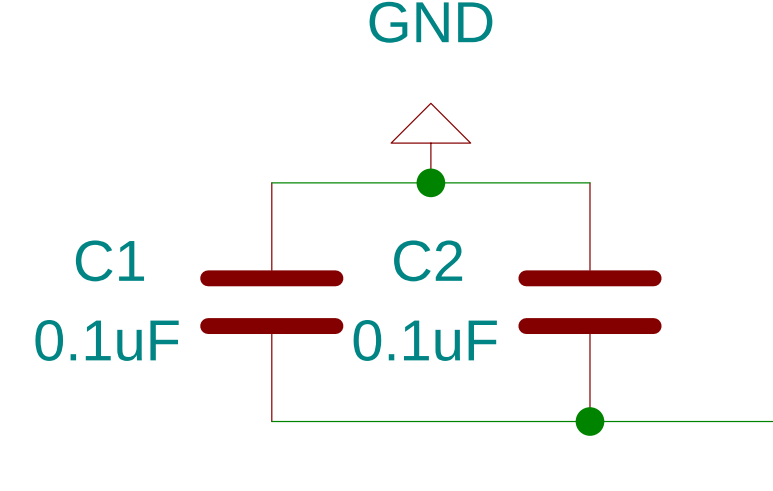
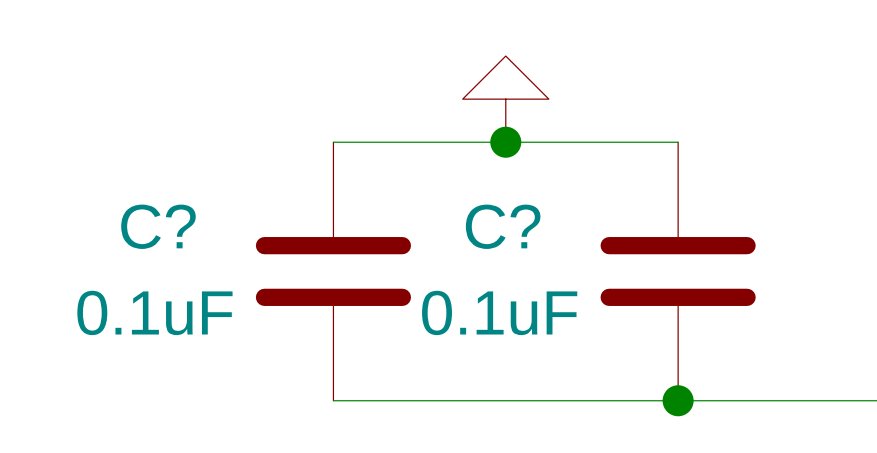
C1 name: C1 (109, 260) -> C? (158, 226)
C2 name: C2 (428, 260) -> C? (503, 226)

